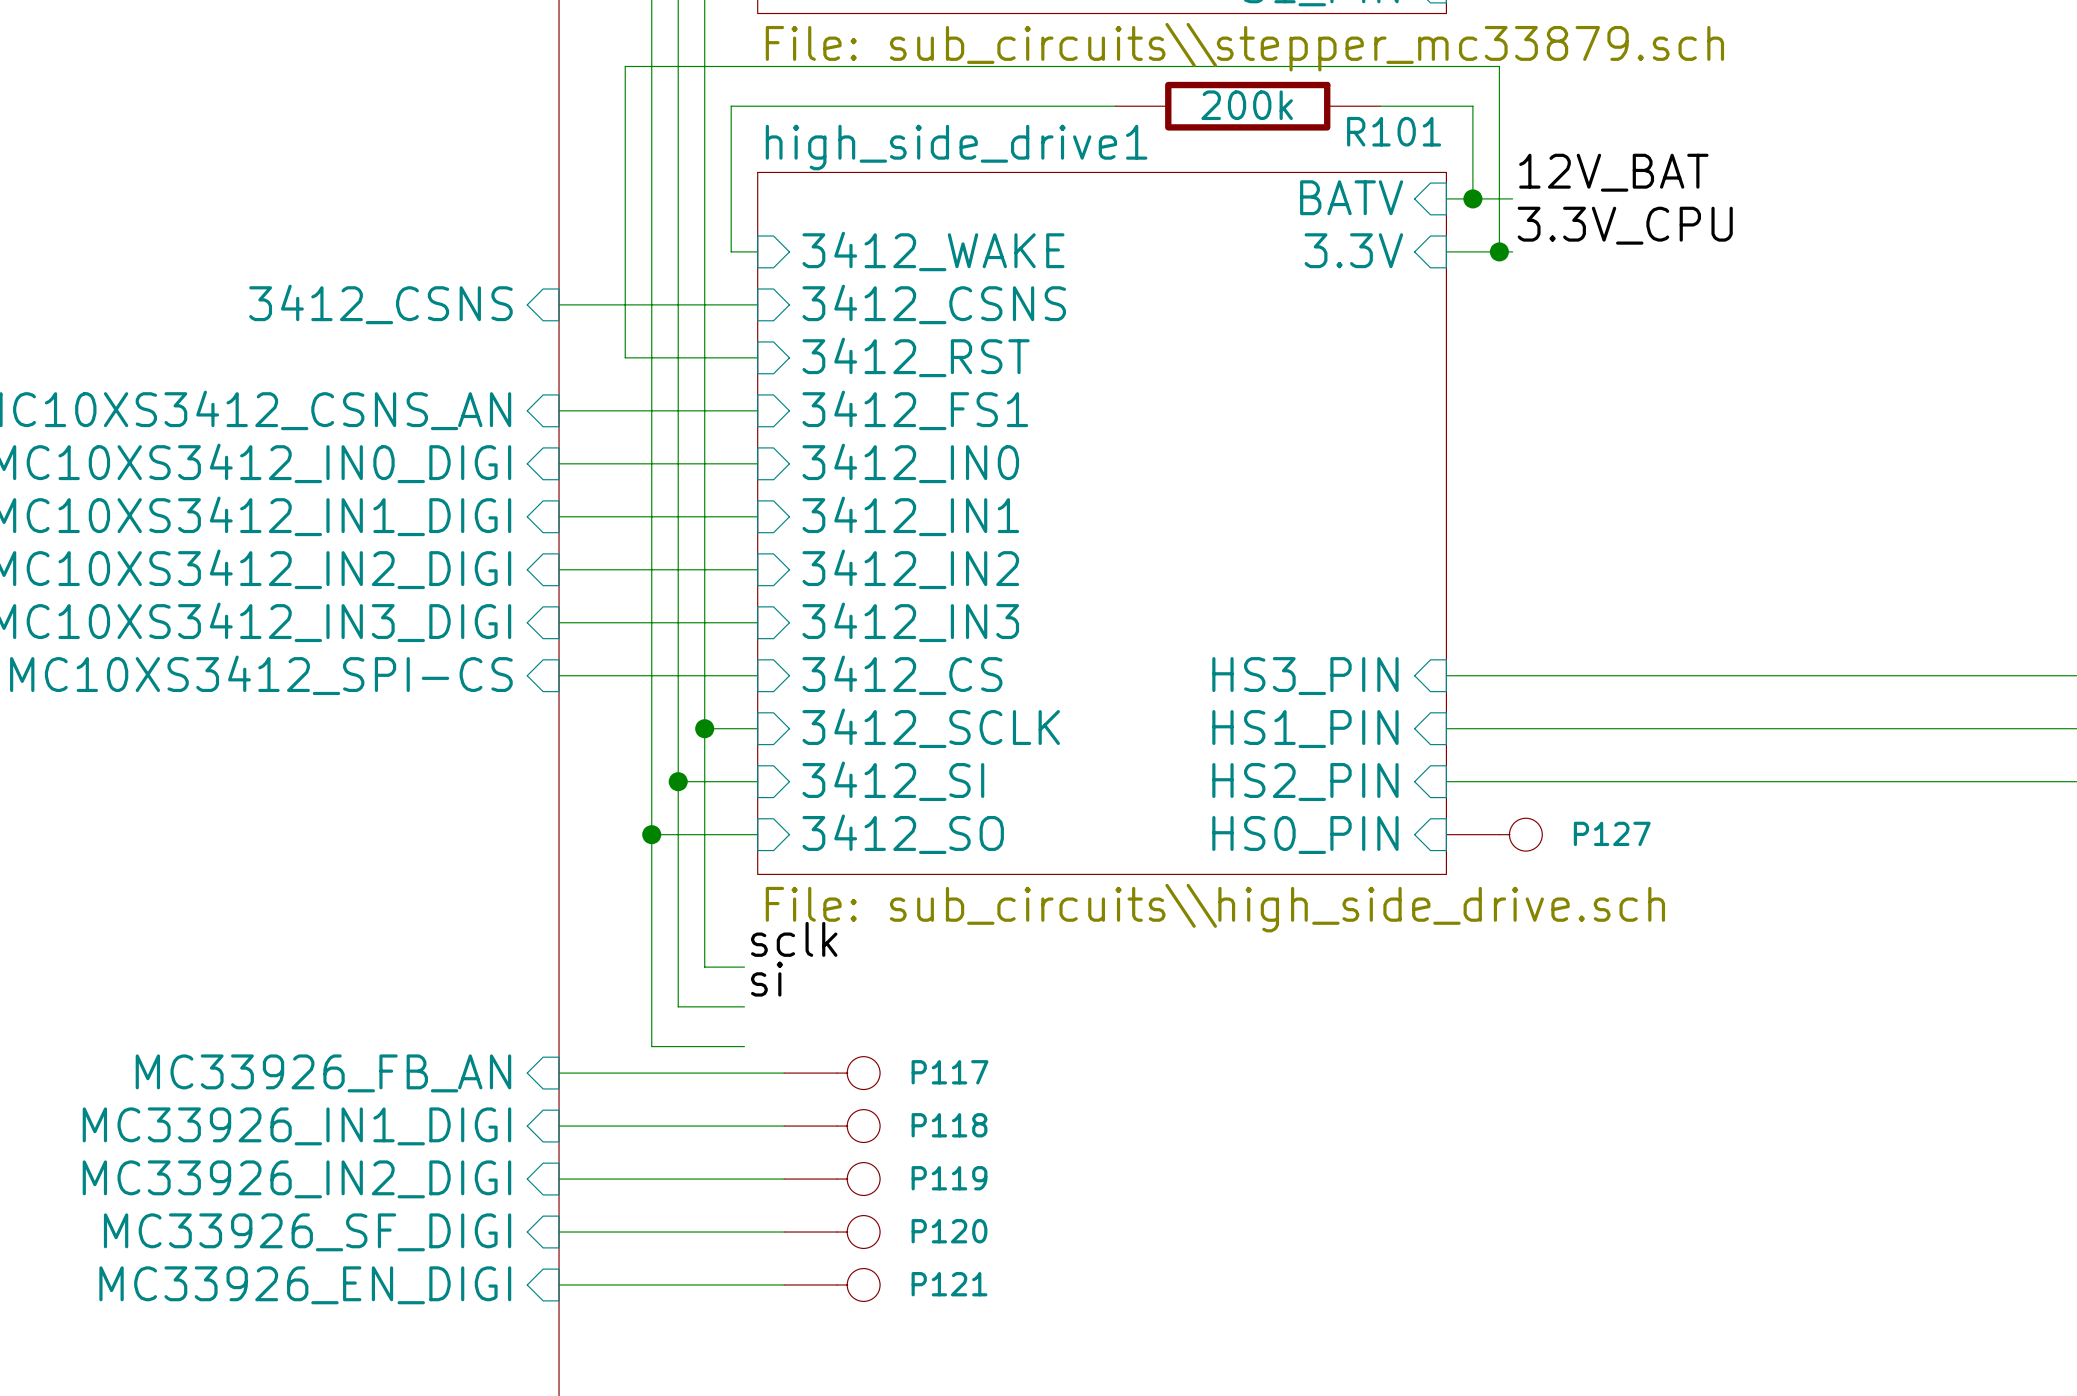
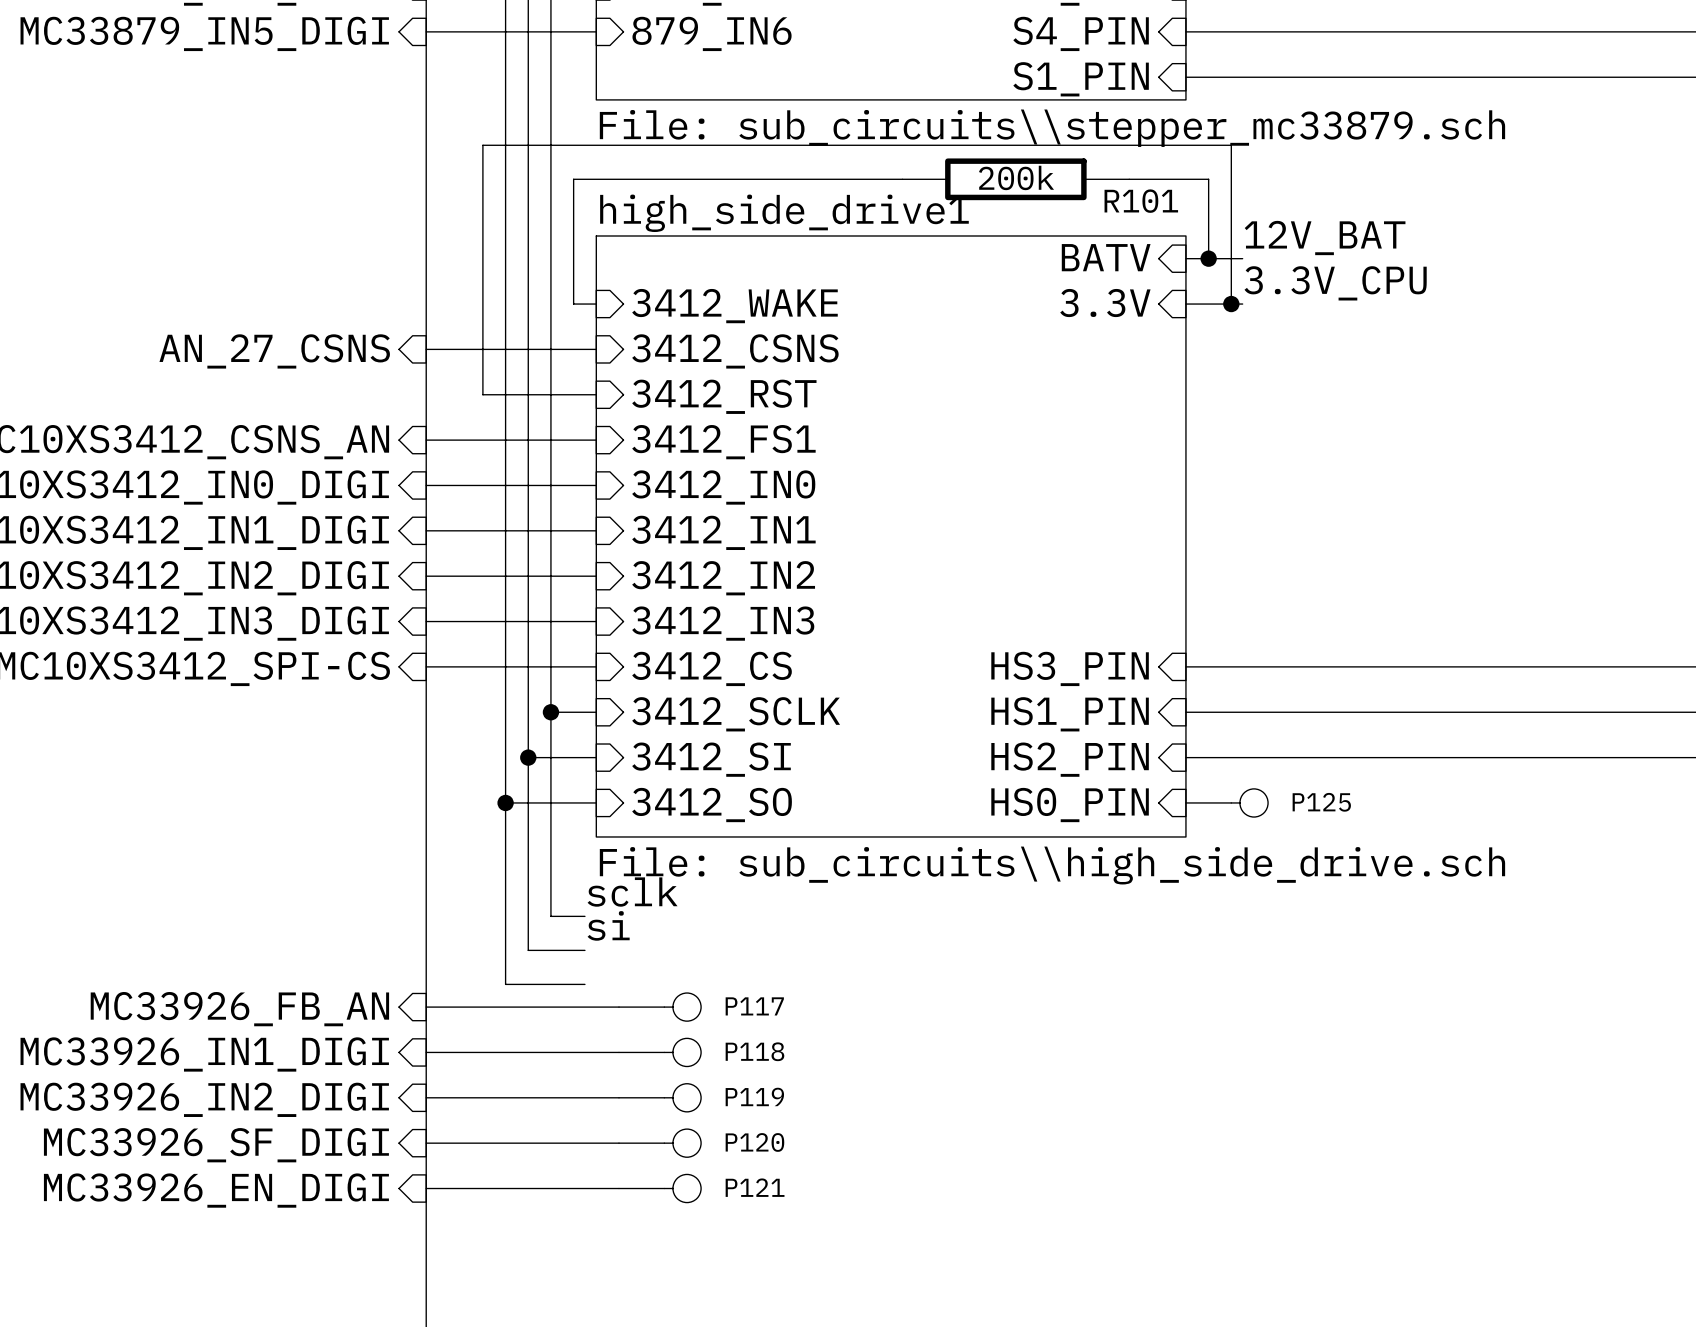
sheet pin: 3412_CSNS (380, 304) -> AN_27_CSNS (274, 351)
P127 name: P127 (1612, 833) -> P125 (1321, 802)

